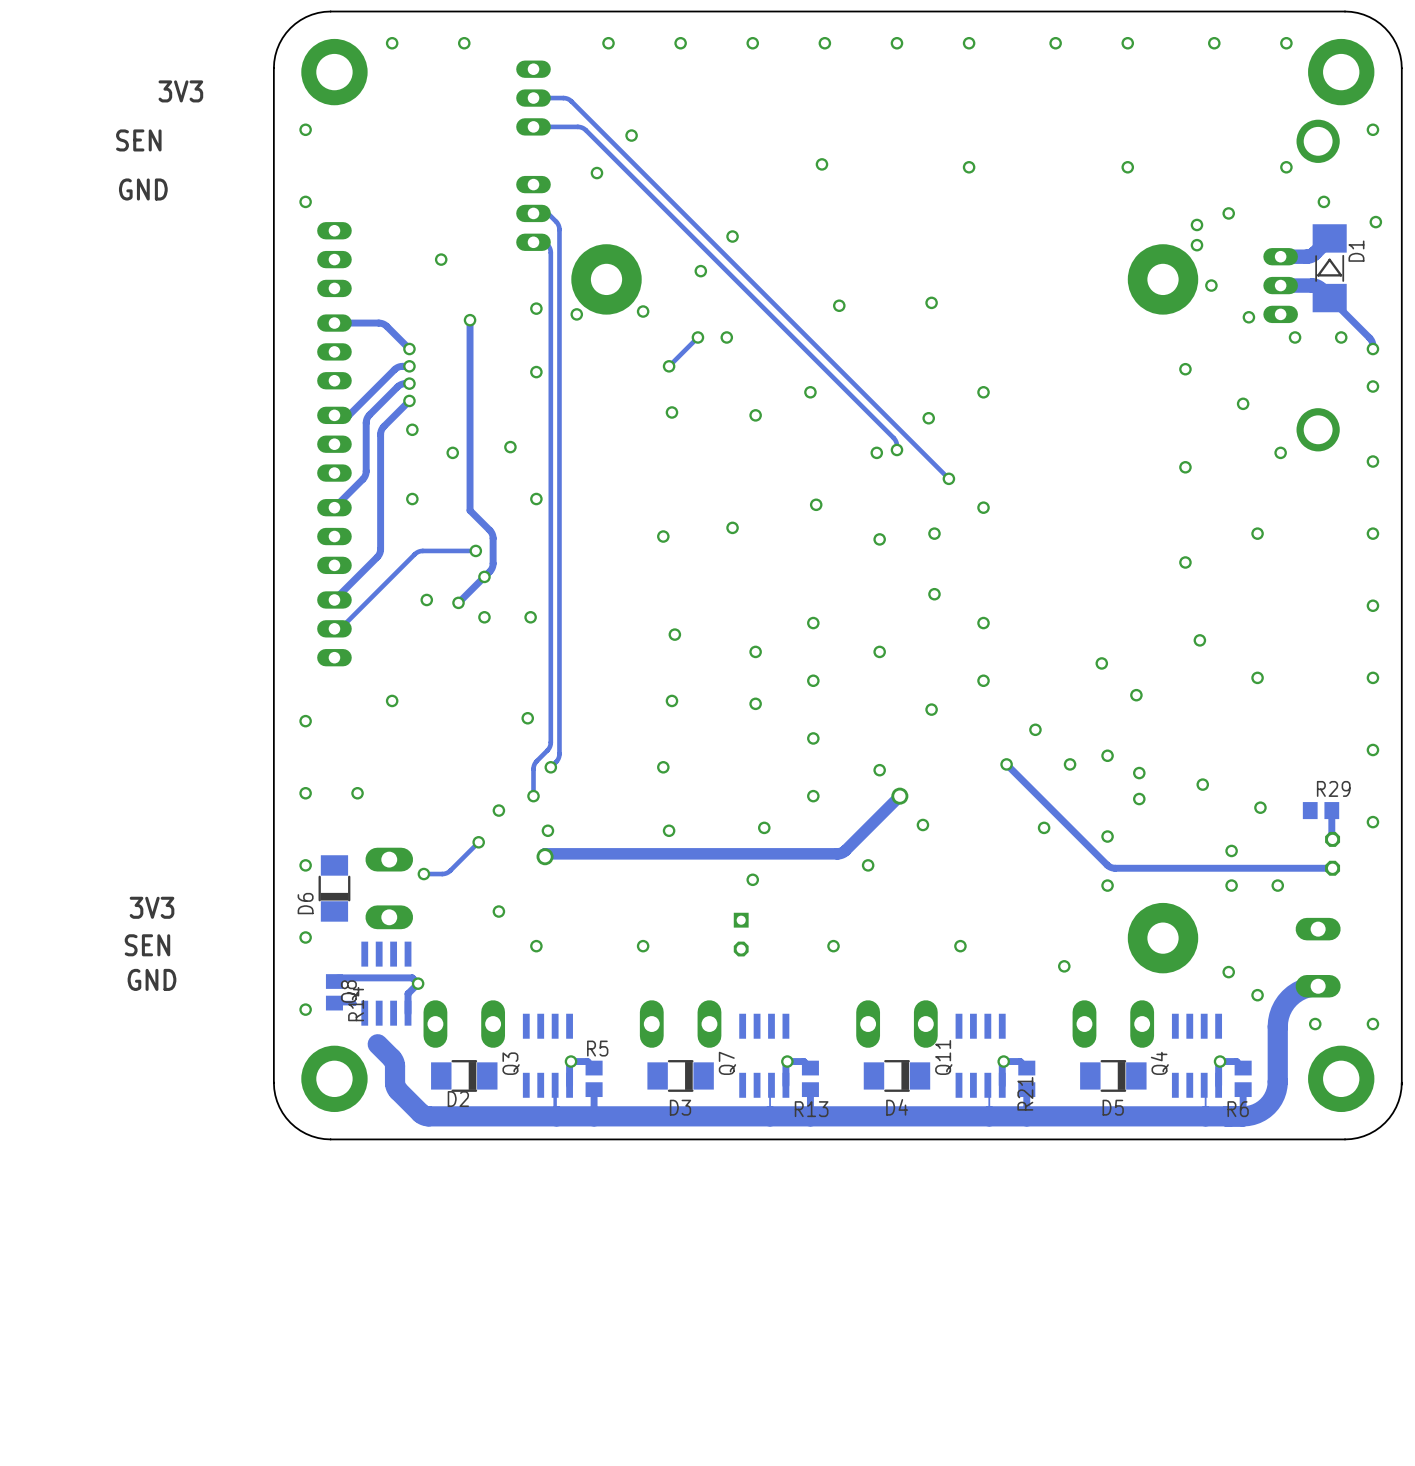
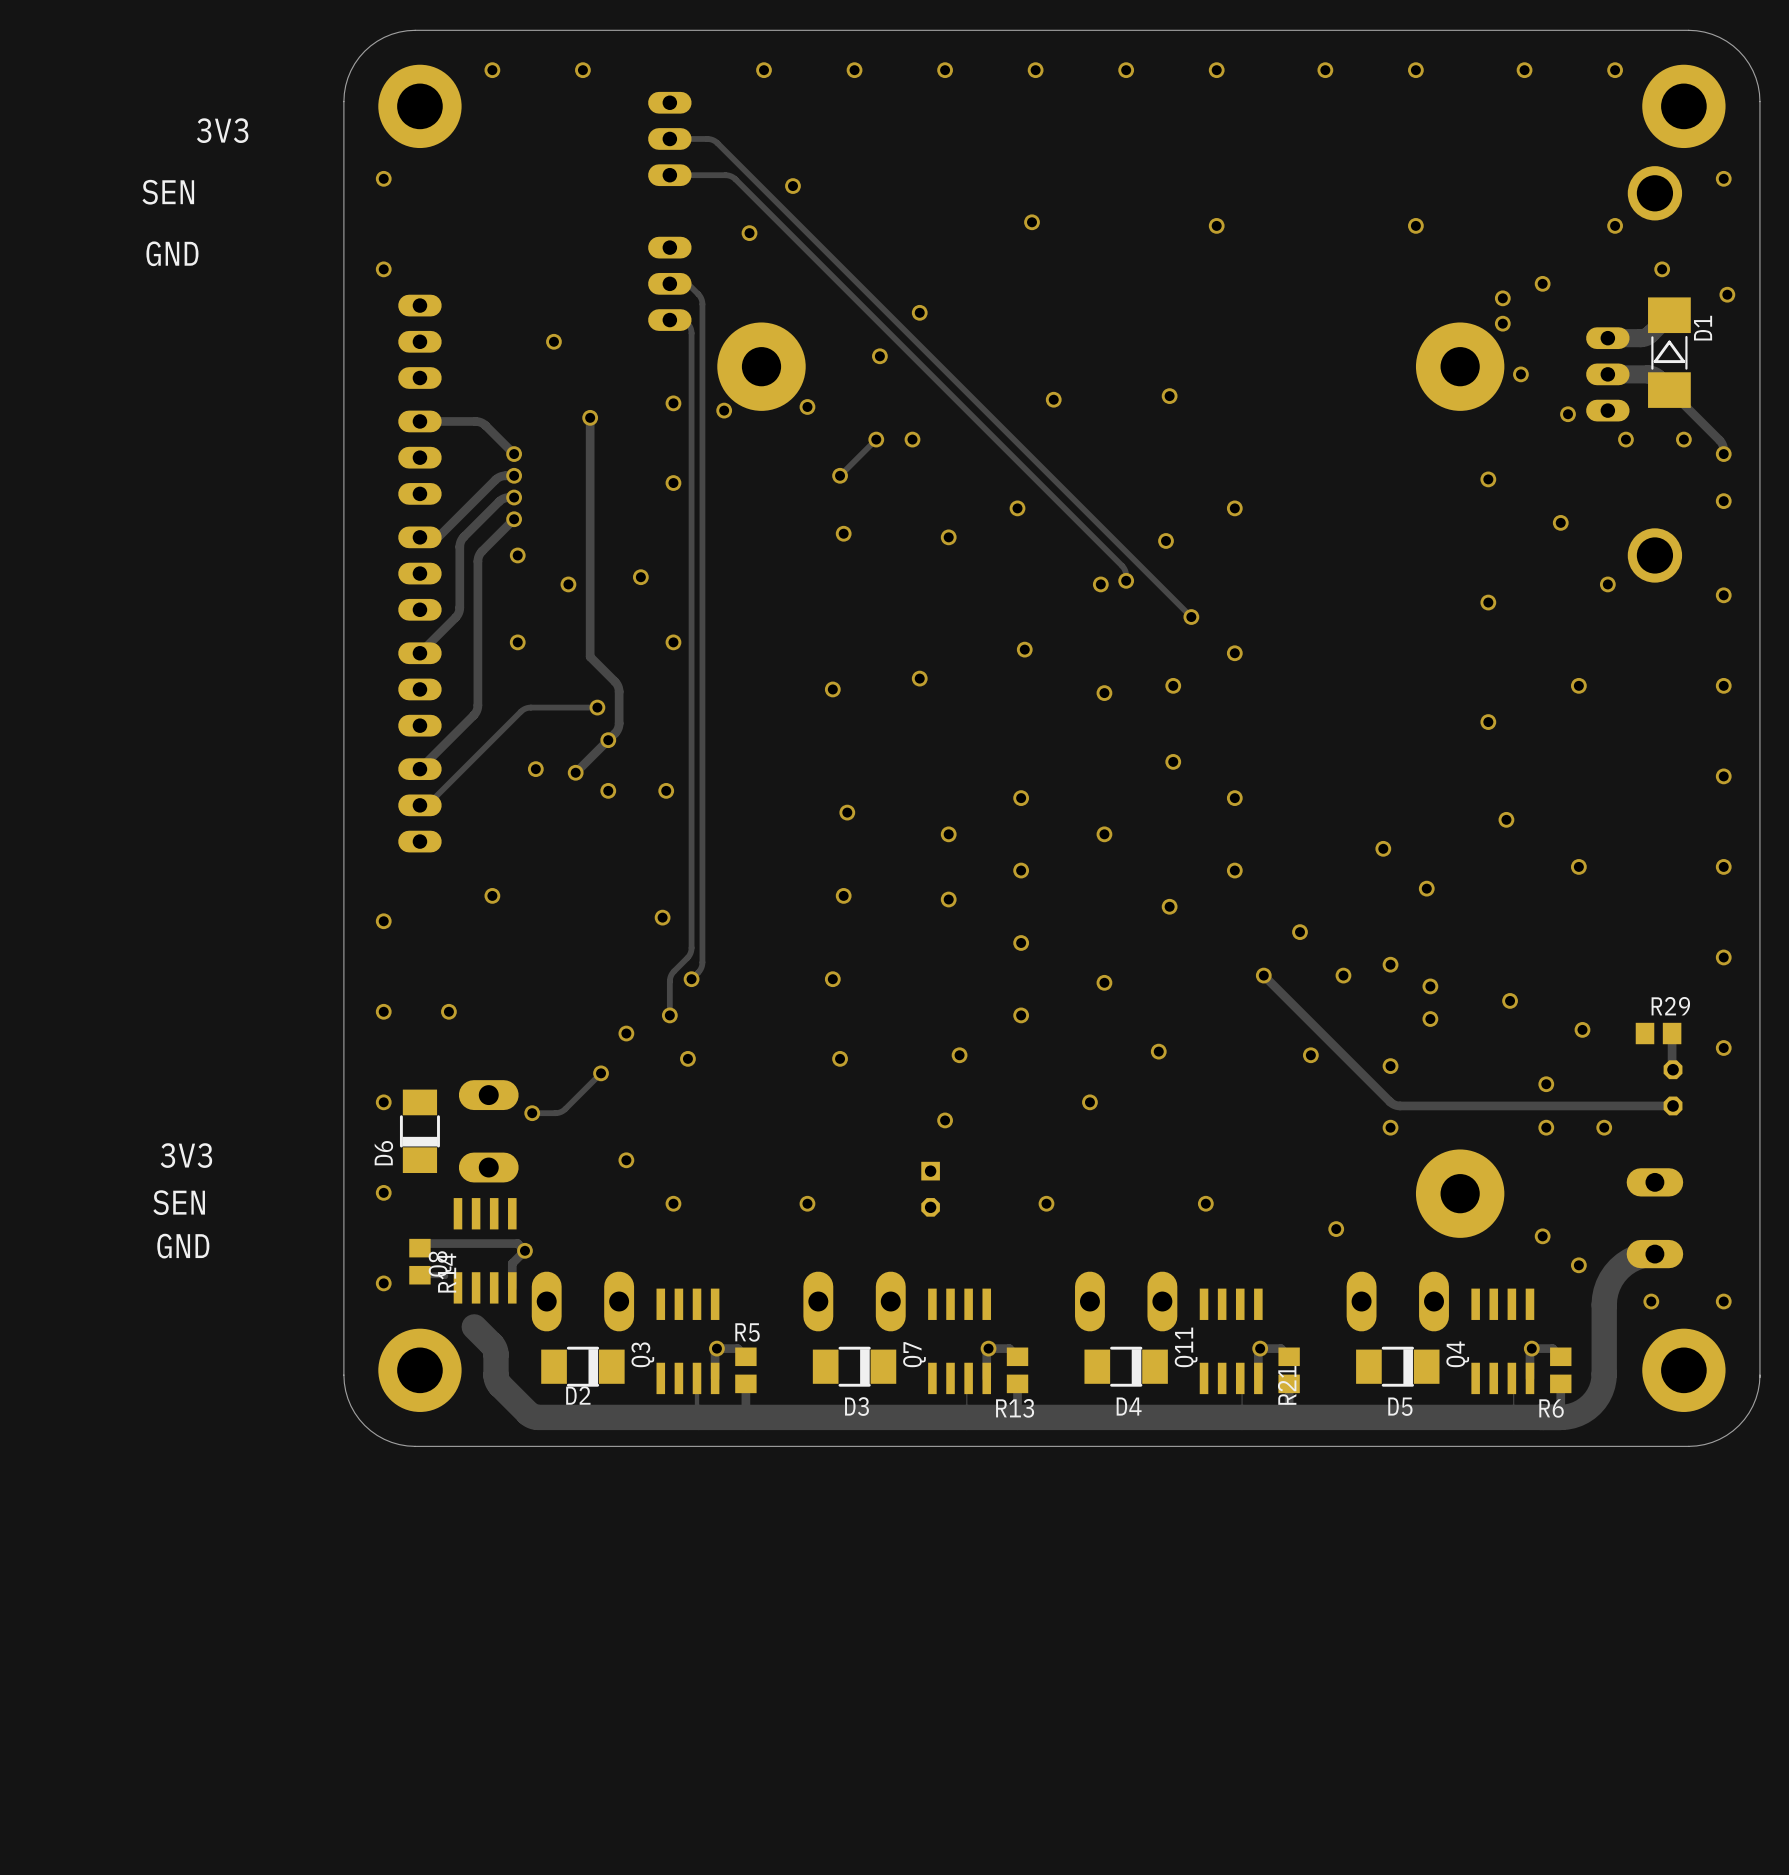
track: (899, 796) (845, 850) (838, 853) (545, 853) (545, 856) -> none
via: (899, 796) -> none
via: (545, 856) -> none

